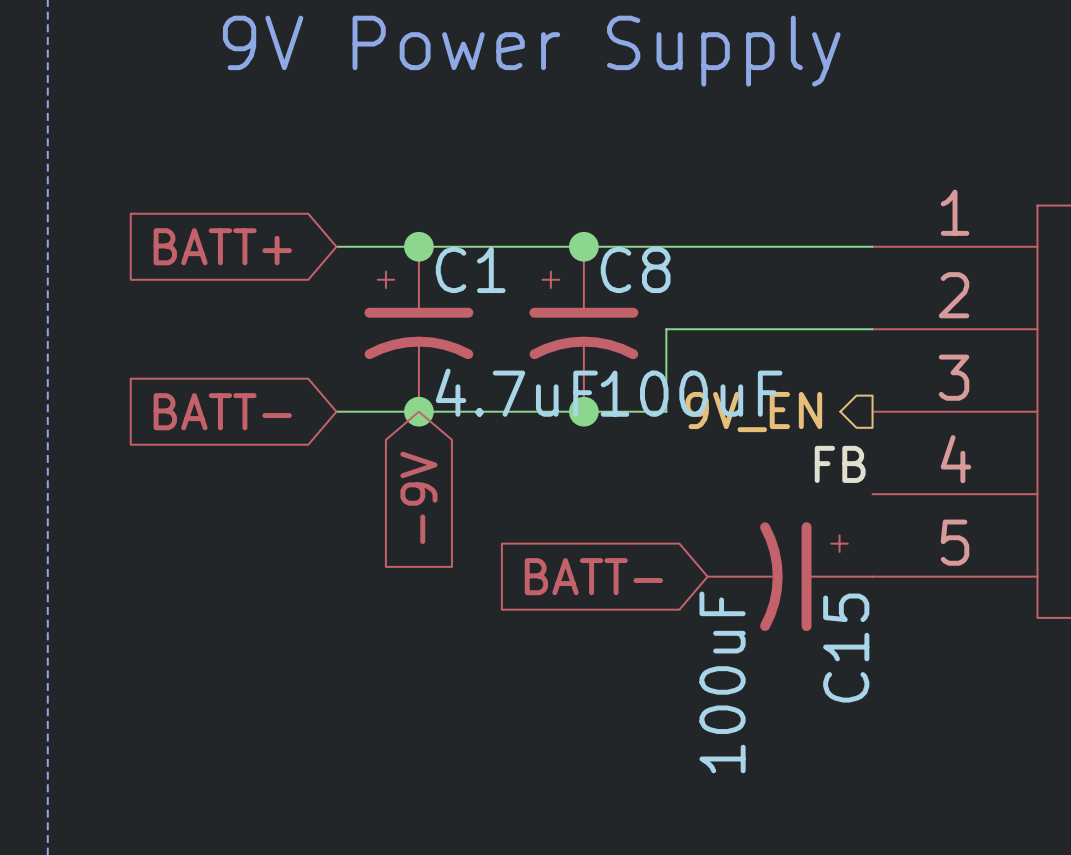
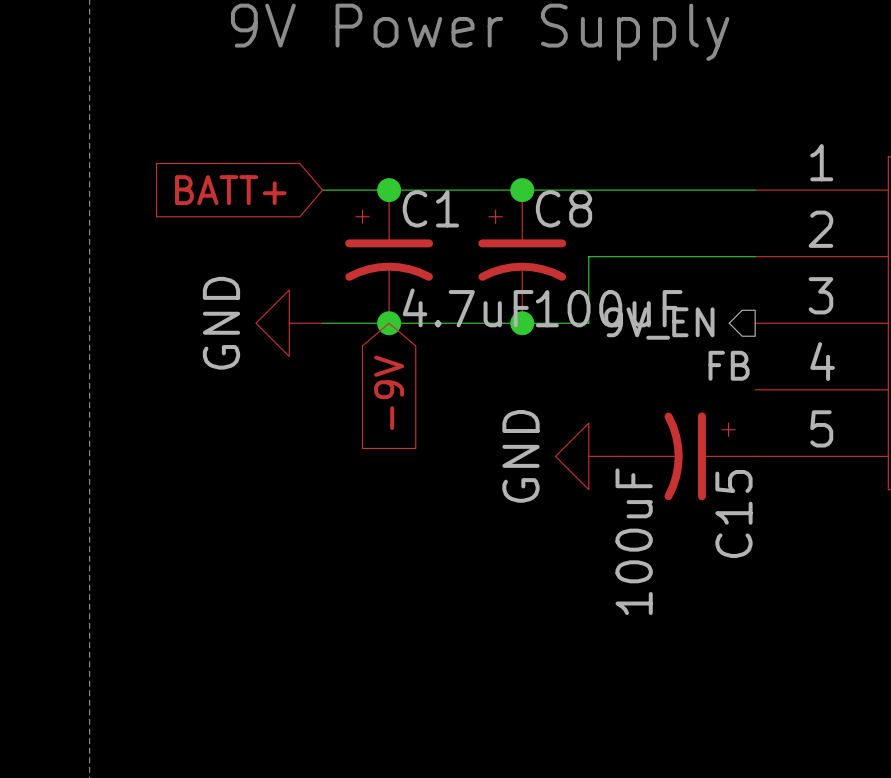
global label: BATT- (222, 411) -> none
power symbol: none -> GND (289, 323)
global label: BATT- (593, 576) -> none
power symbol: none -> GND (588, 456)

